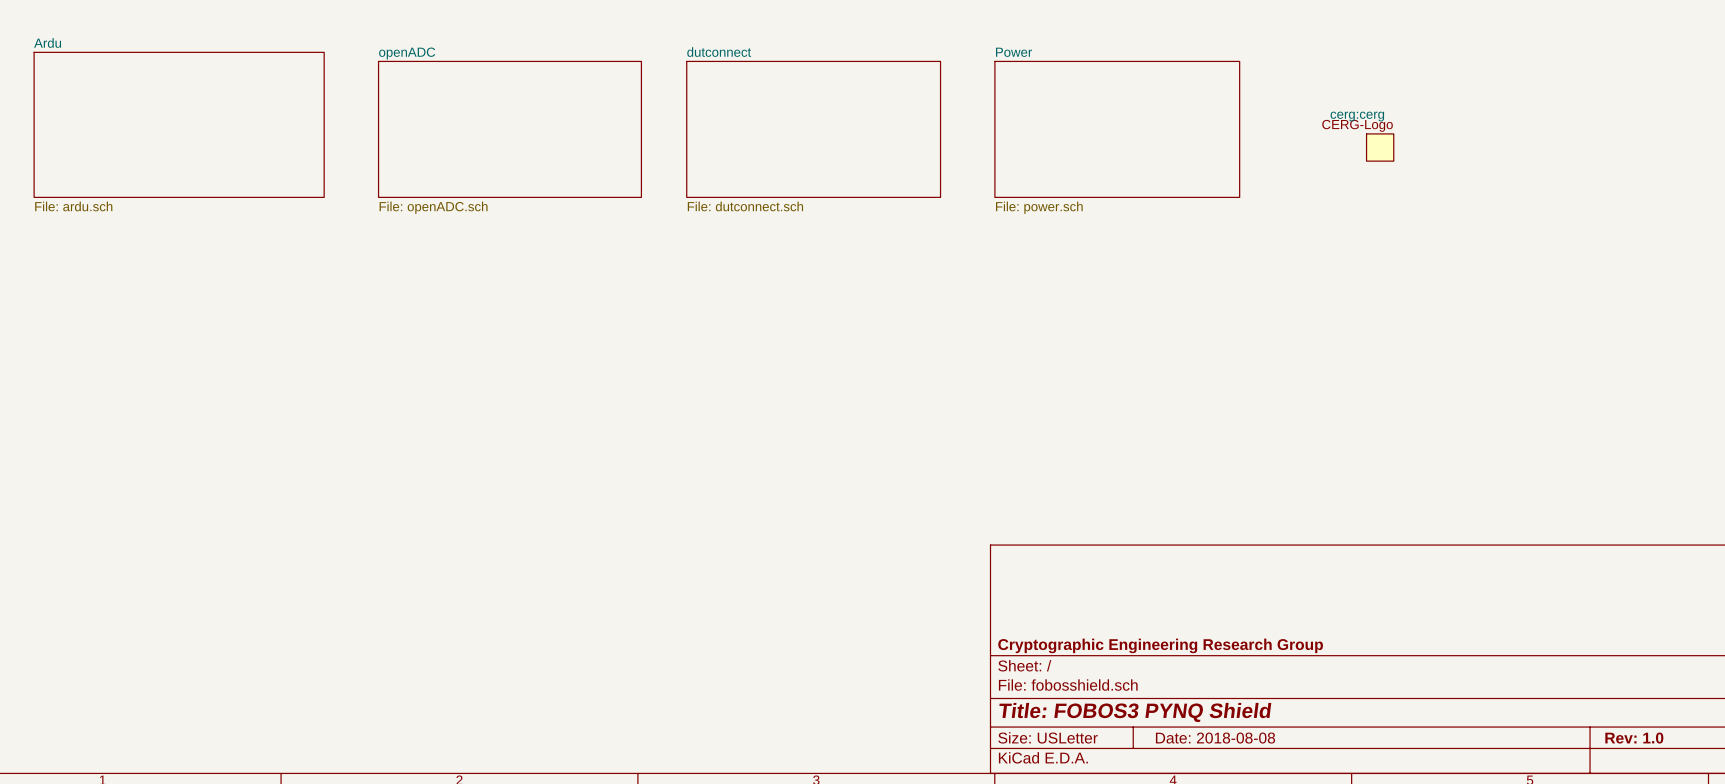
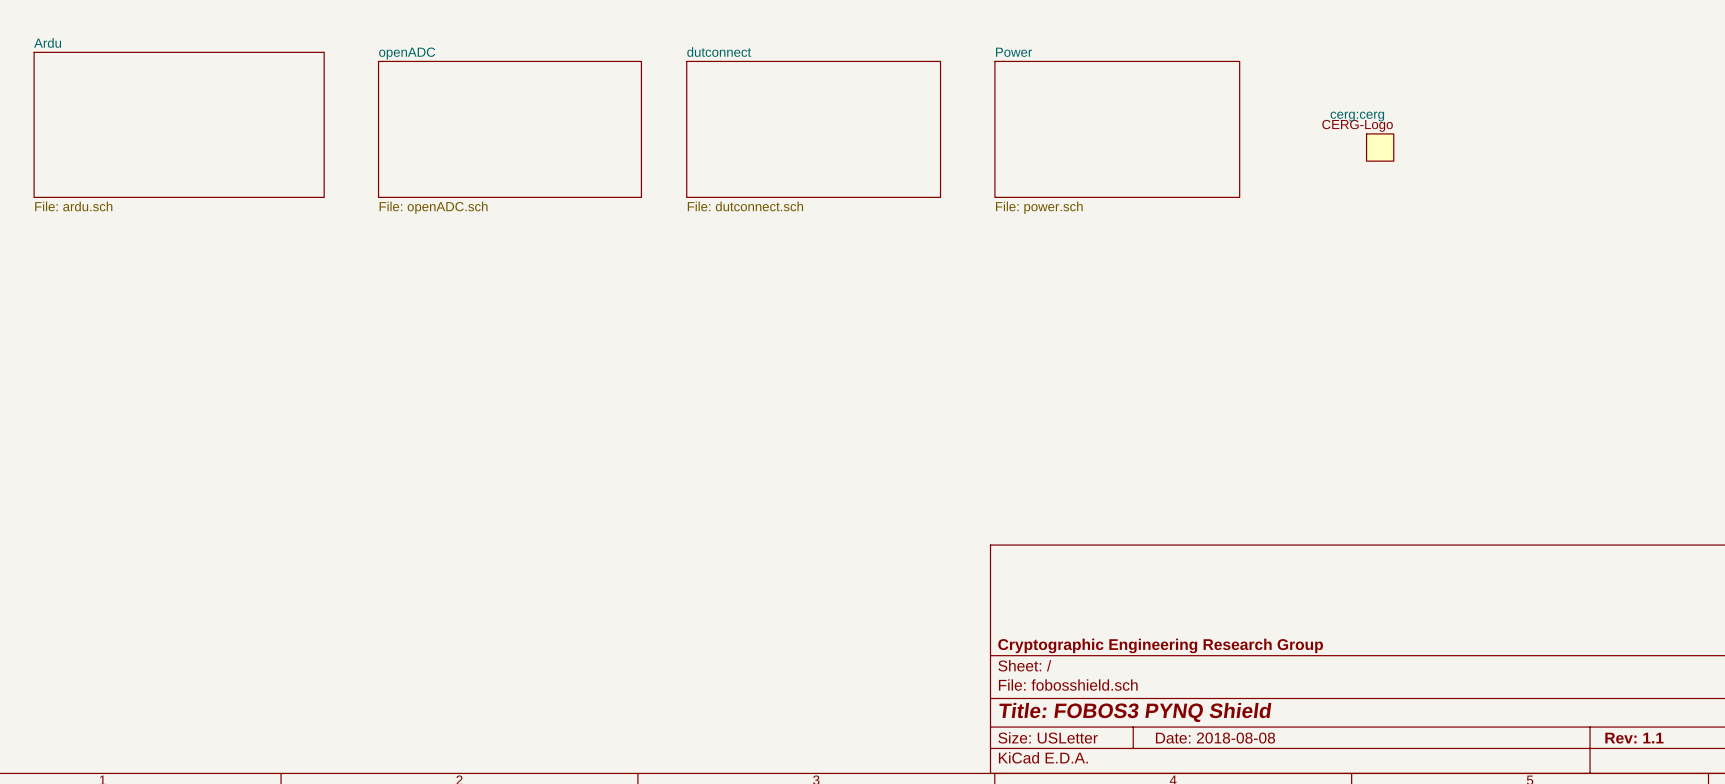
title block: Rev: 1.0 (1634, 738) -> Rev: 1.1 (1634, 738)

